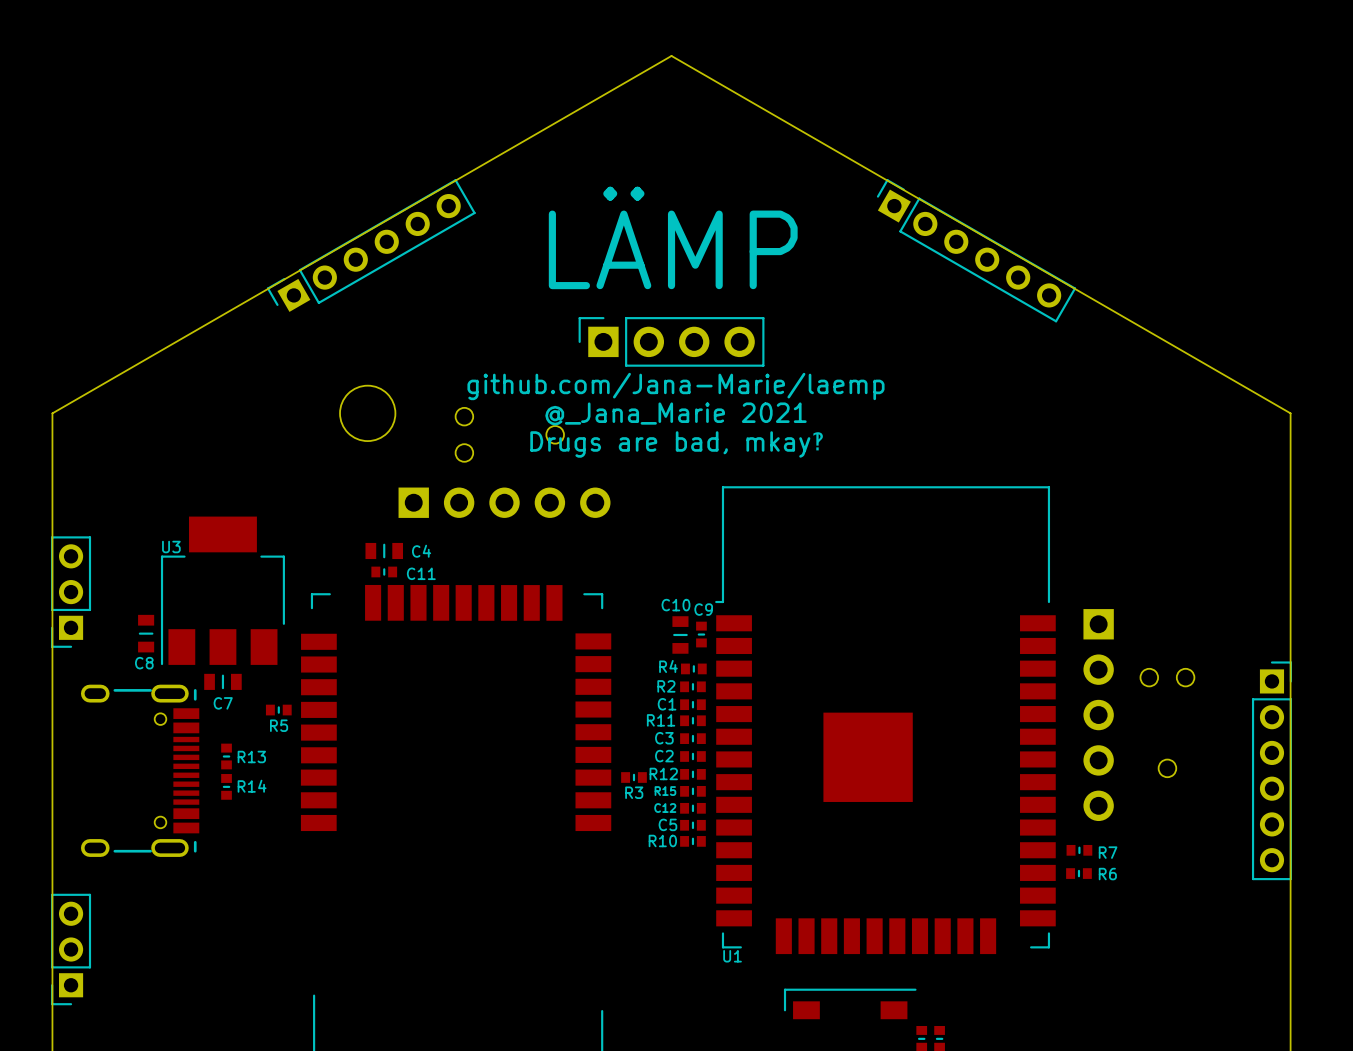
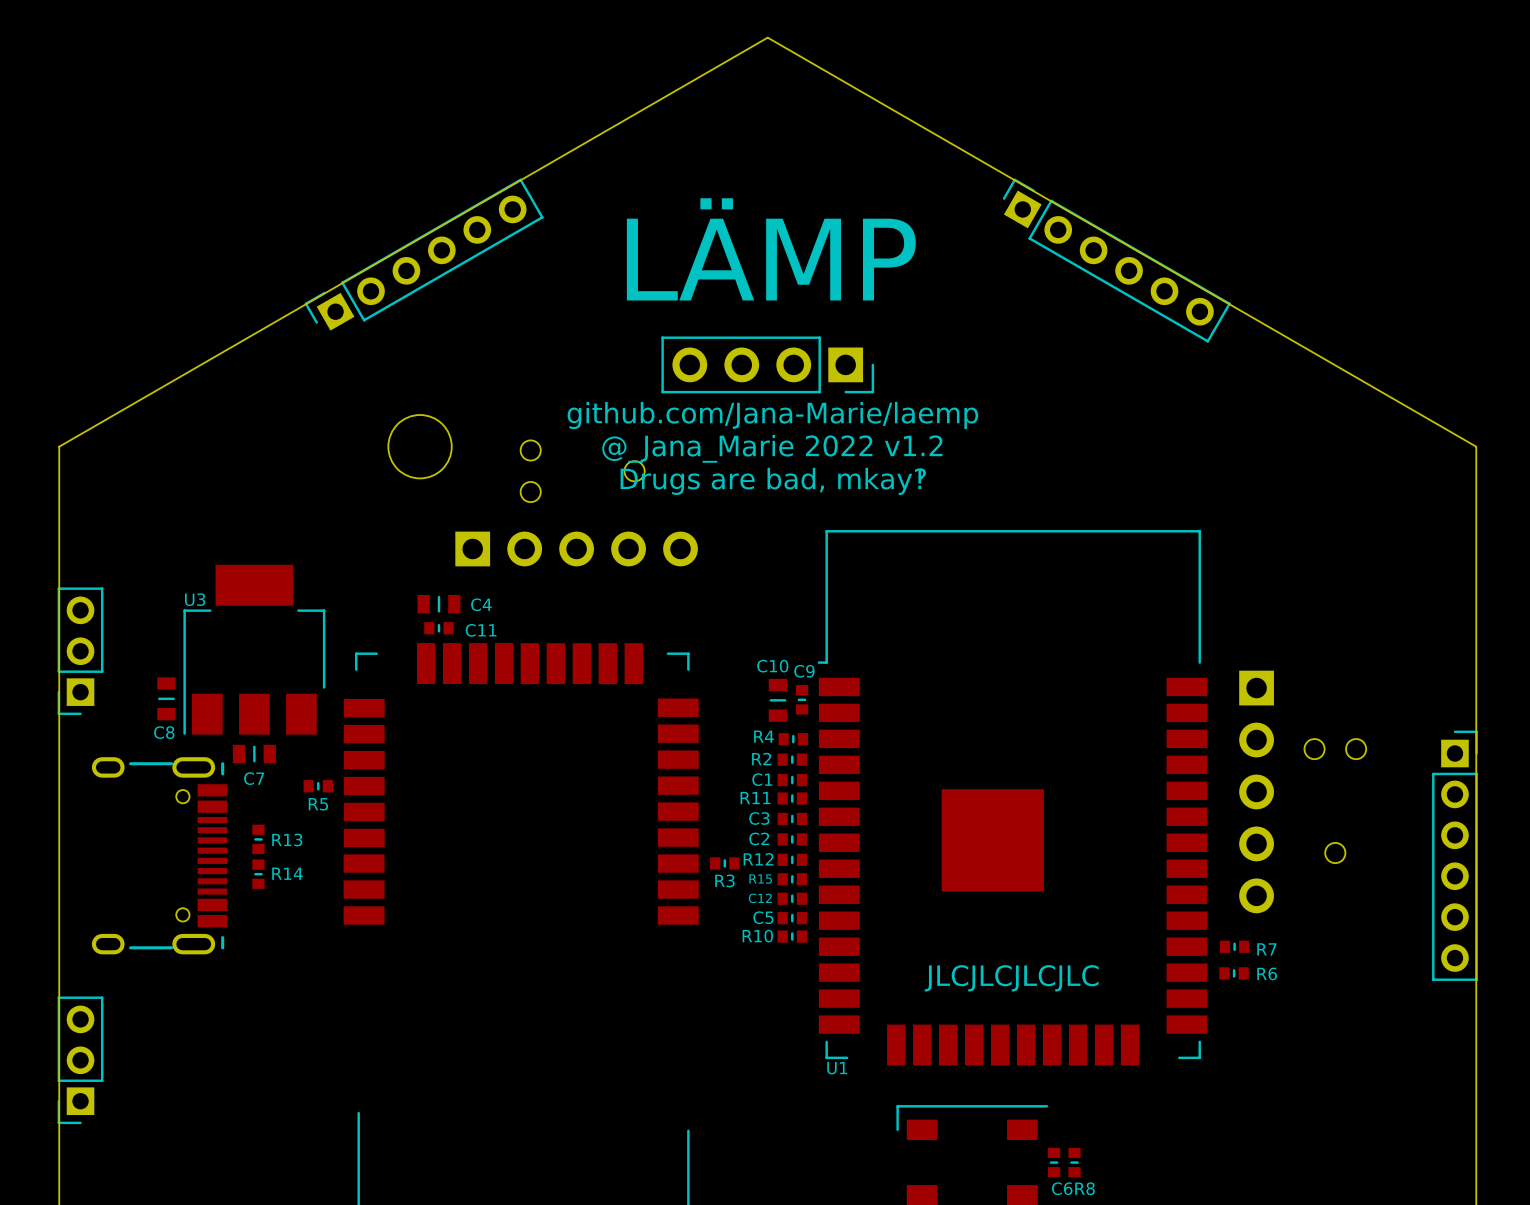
part rotation: 0° (671, 341) -> 180° (767, 364)
text: @_Jana_Marie 2021 (675, 413) -> @_Jana_Marie 2022 v1.2 (772, 448)
text: none -> JLCJLCJLCJLC (1011, 978)

